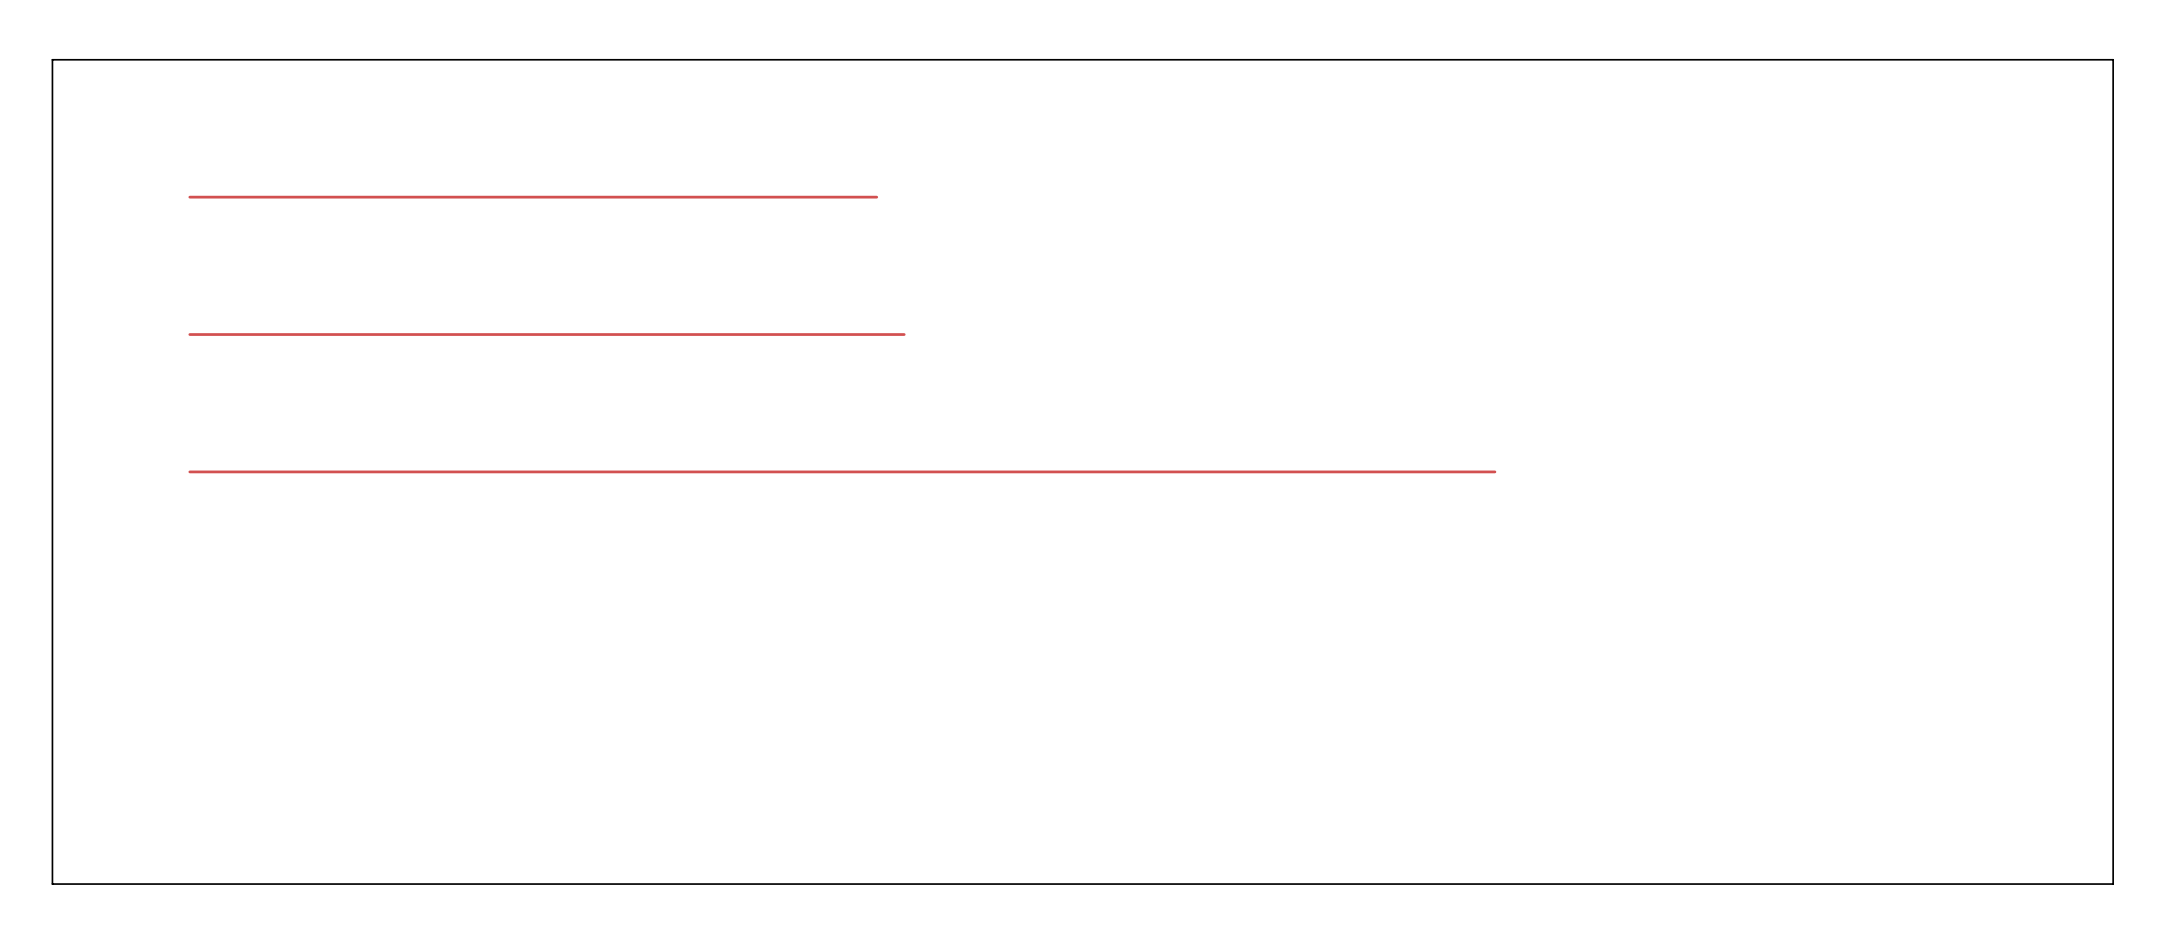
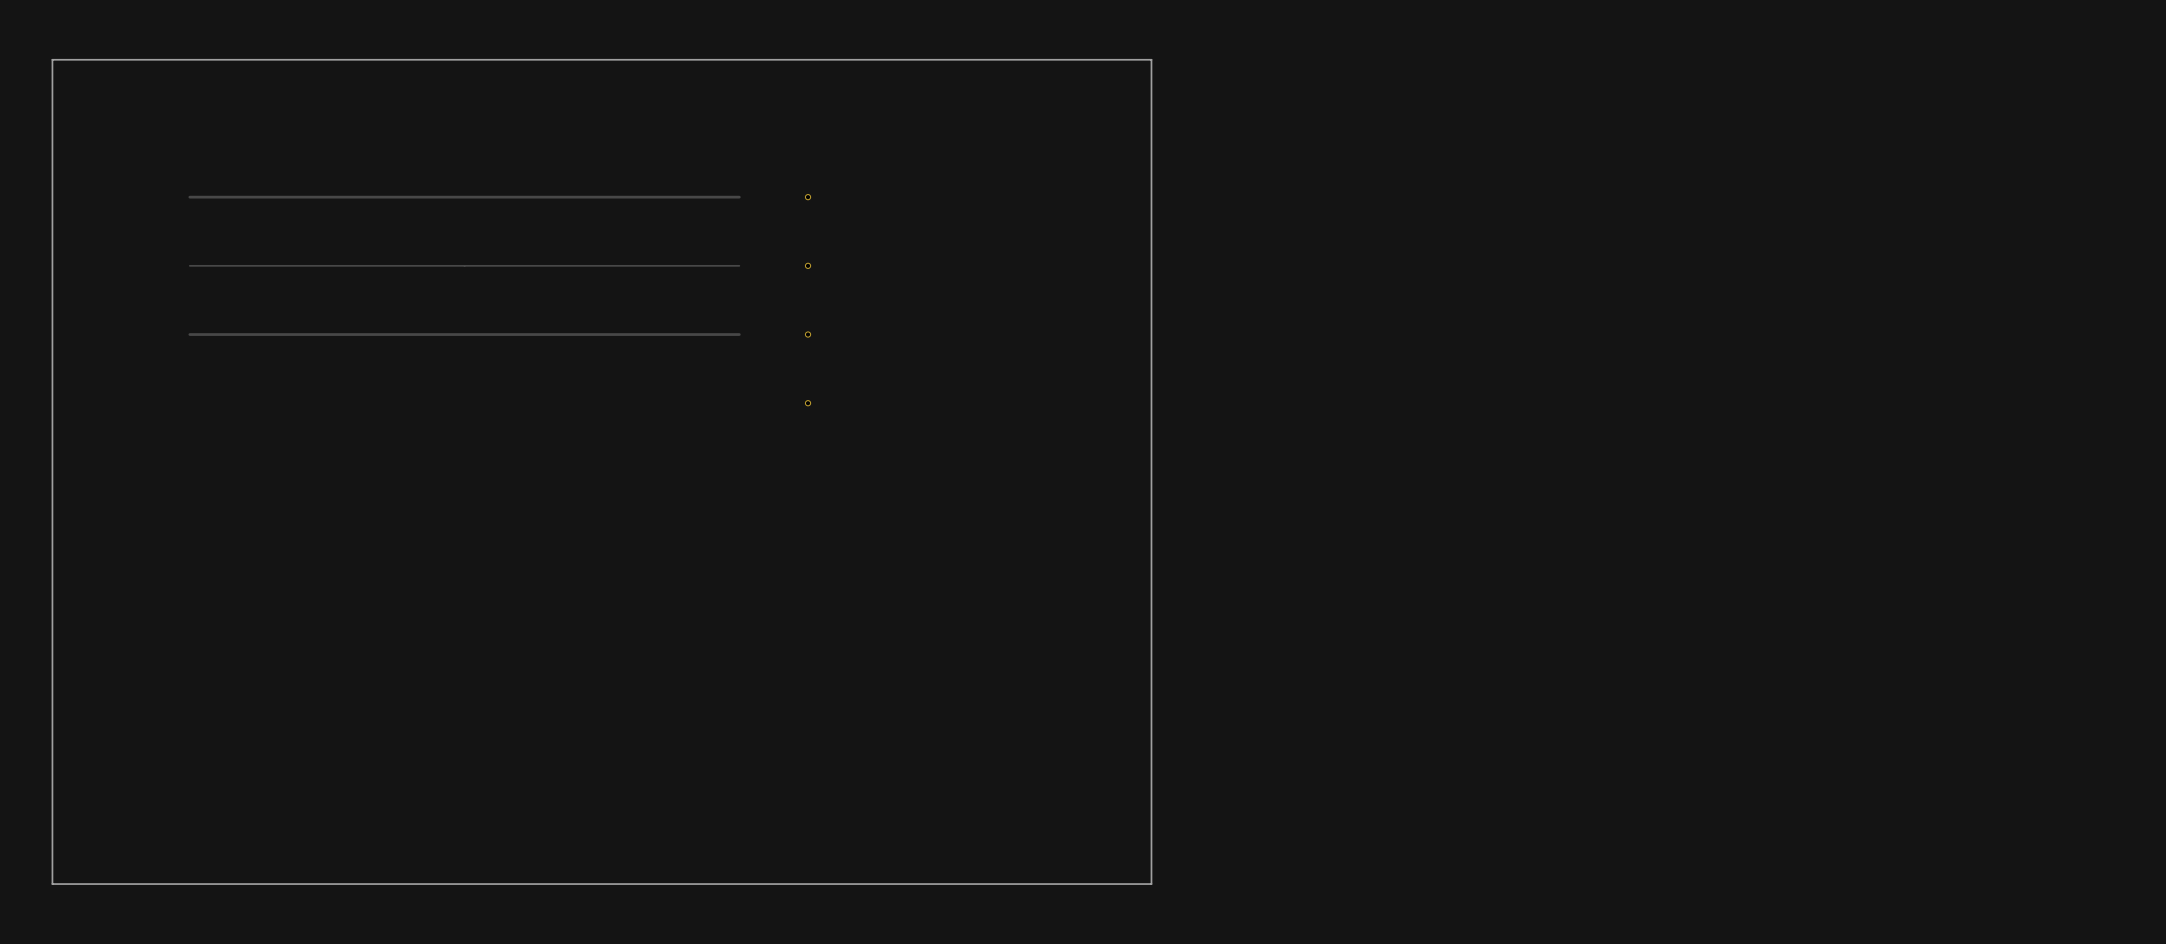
board edge: (1151, 59) (2113, 59) (2113, 884) (1151, 884) -> (1151, 59) (1151, 884)
track: (739, 197) (876, 197) -> none
via: none -> (808, 197)
track: none -> (189, 265) (739, 265)
via: none -> (808, 265)
track: (739, 334) (904, 334) -> none
via: none -> (808, 334)
via: none -> (808, 403)
track: (189, 471) (1494, 471) -> none

